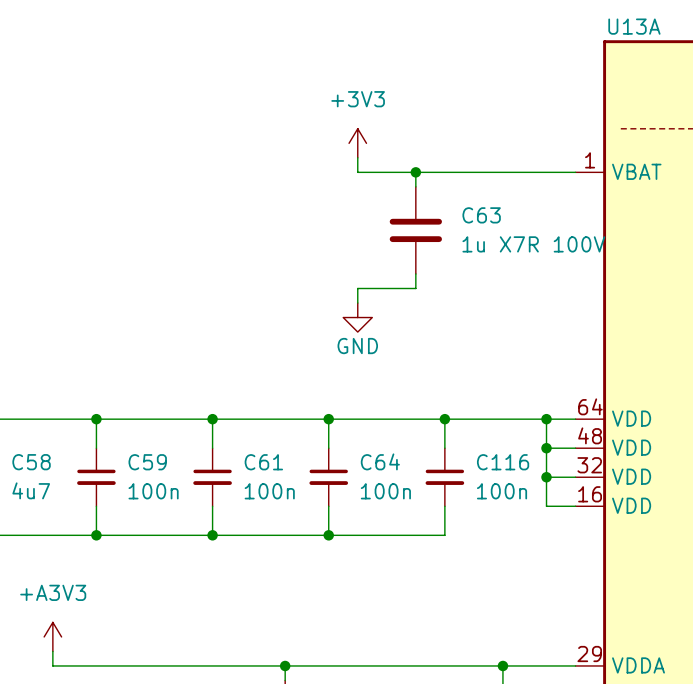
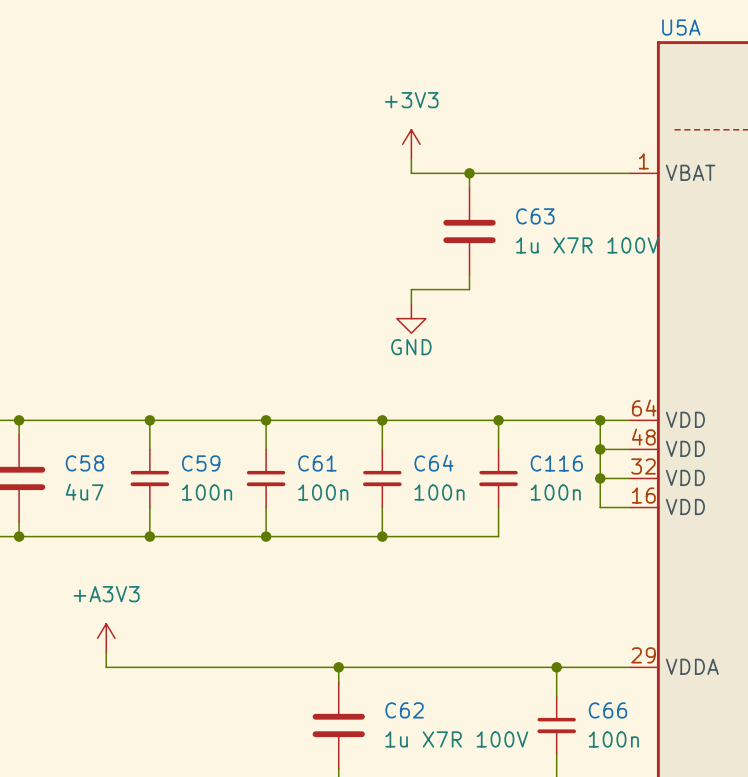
U13A name: U13A (634, 26) -> U5A (681, 27)

